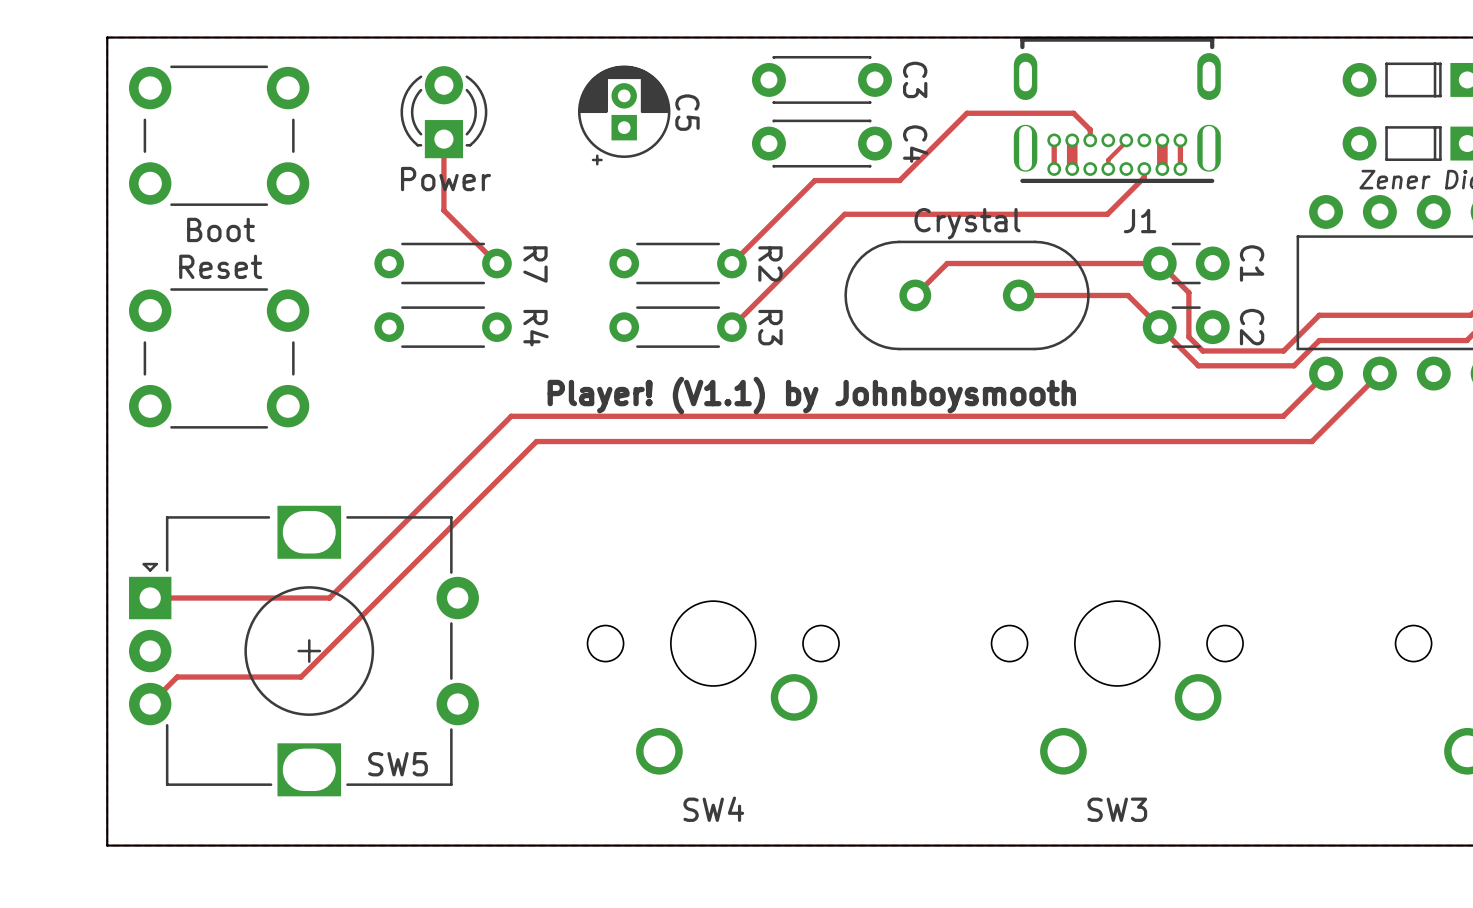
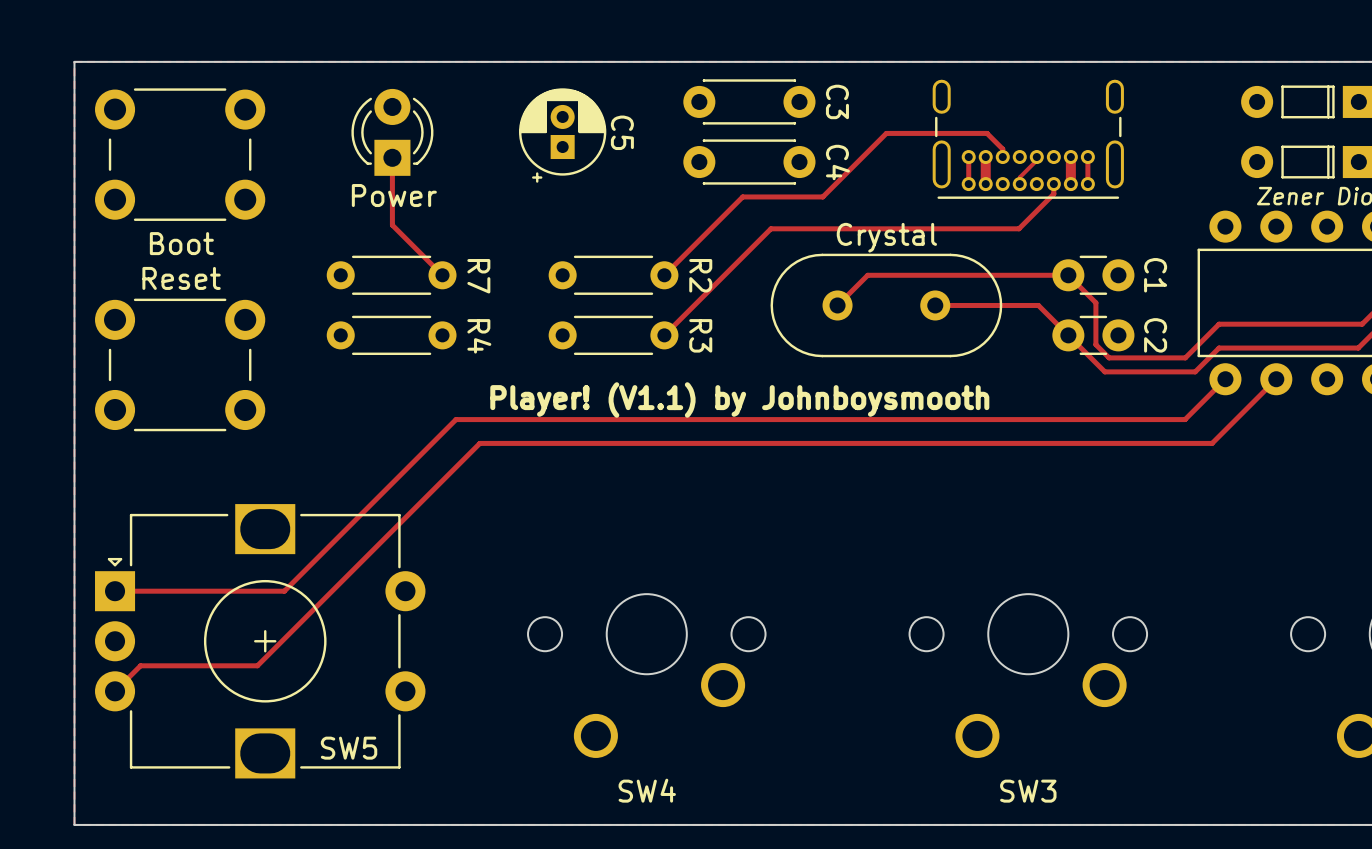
J1: (1117, 110) -> none
part: none -> (1028, 139)

